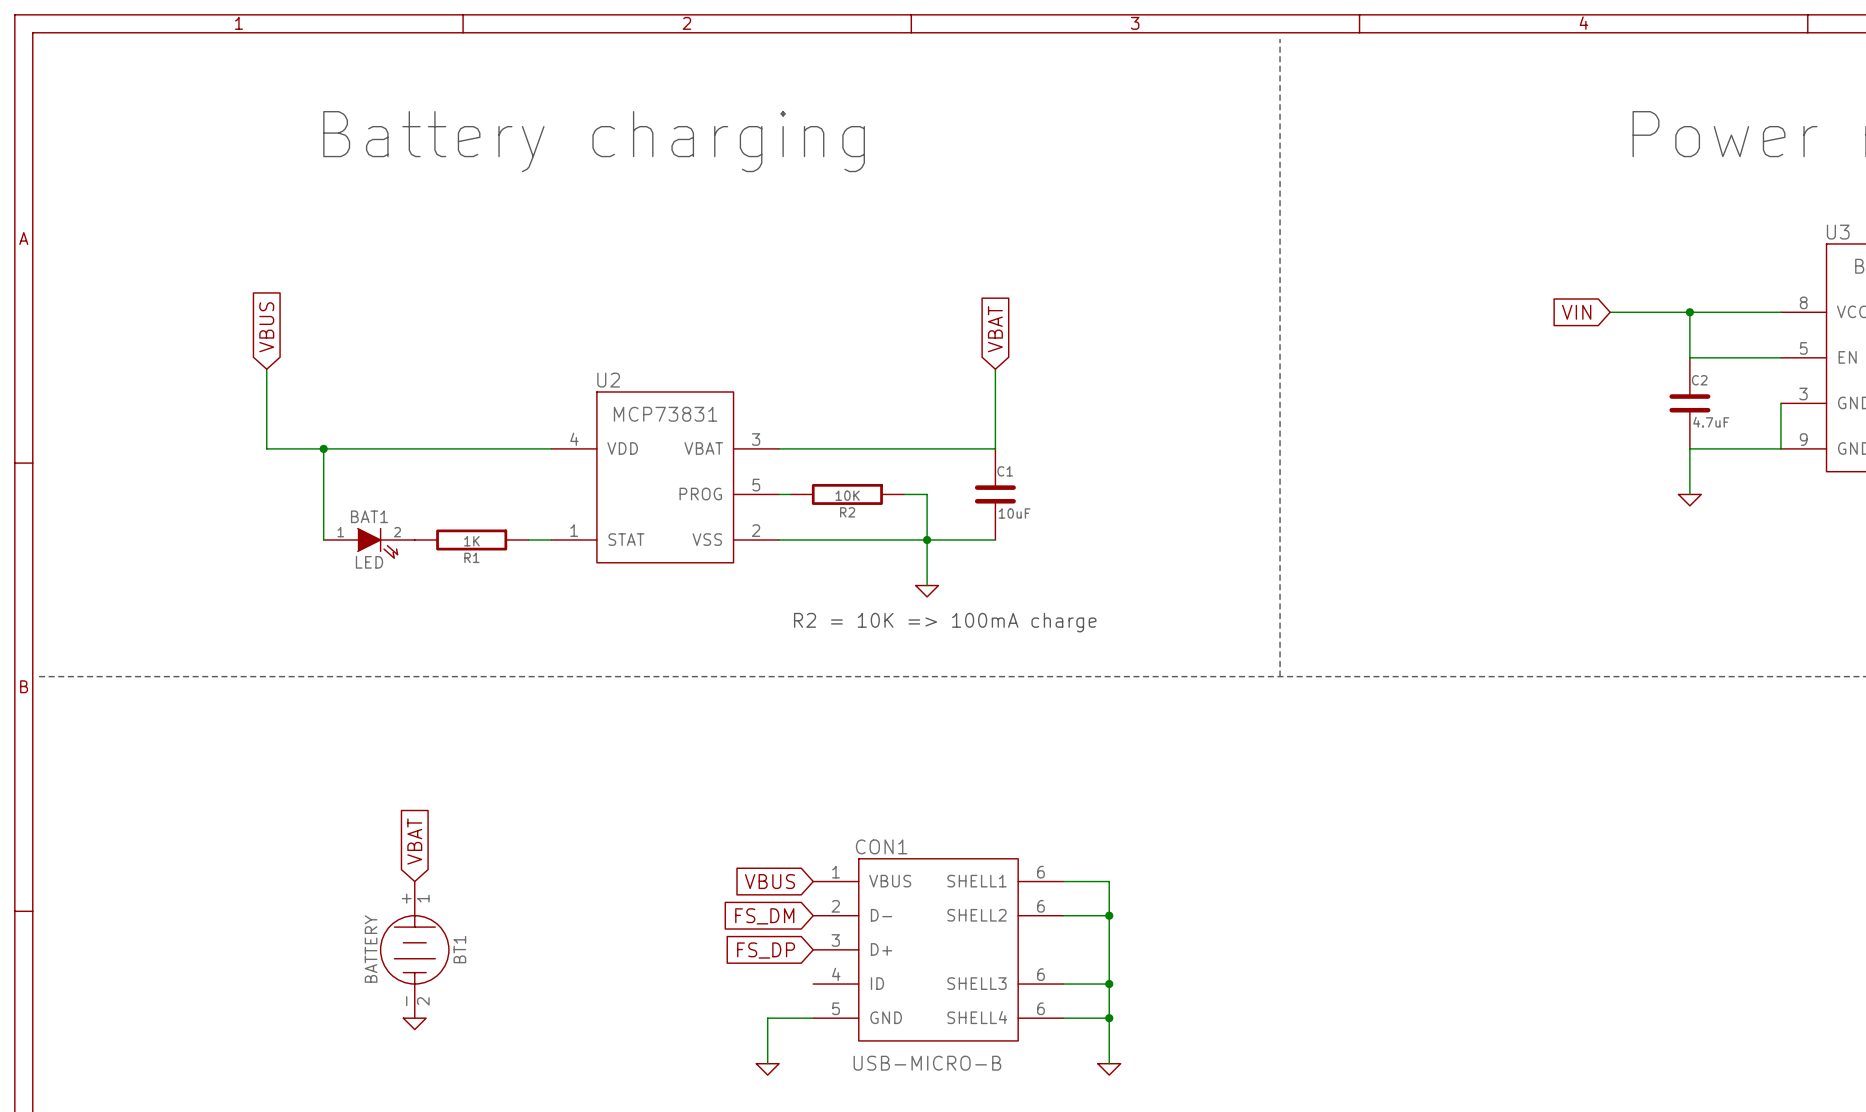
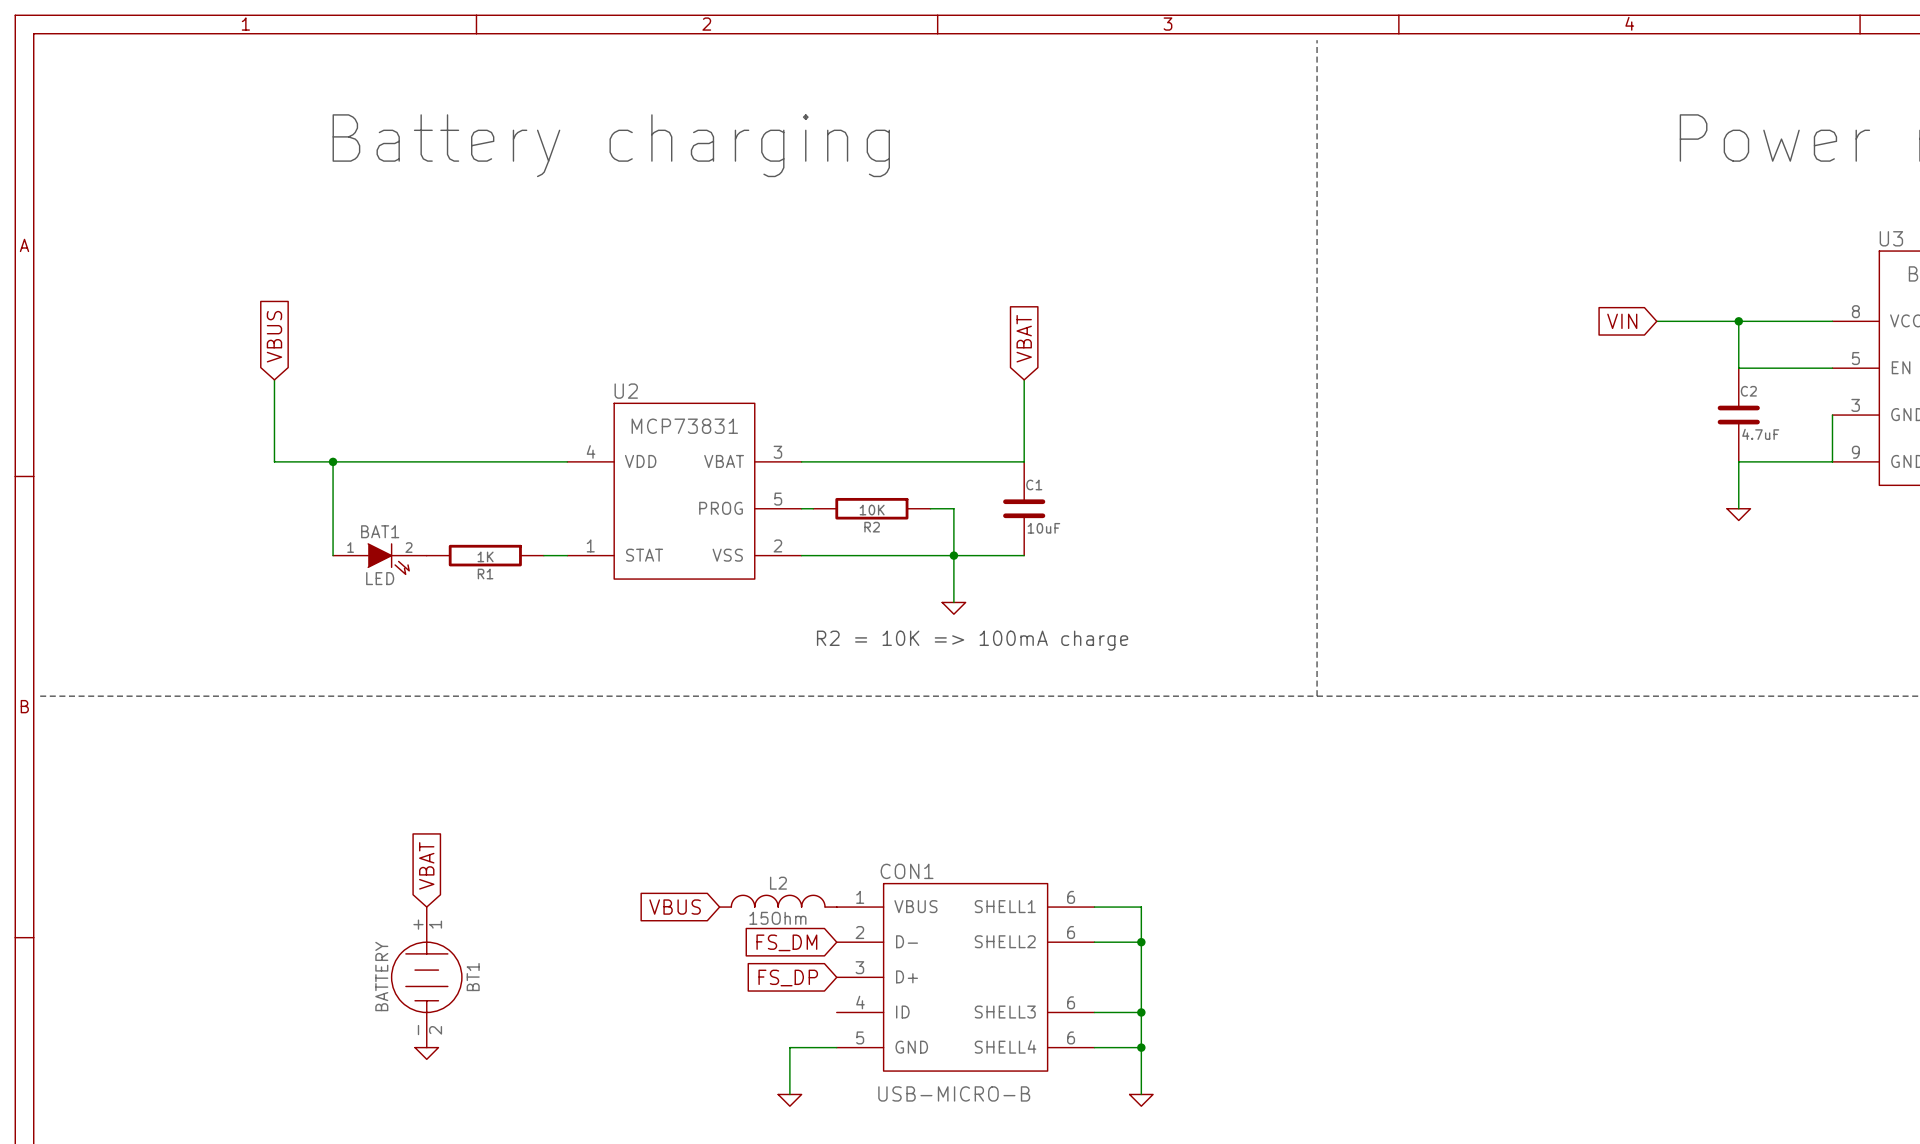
L2: none -> 15Ohm (778, 901)
global label position: VBUS (769, 881) -> VBUS (675, 907)

